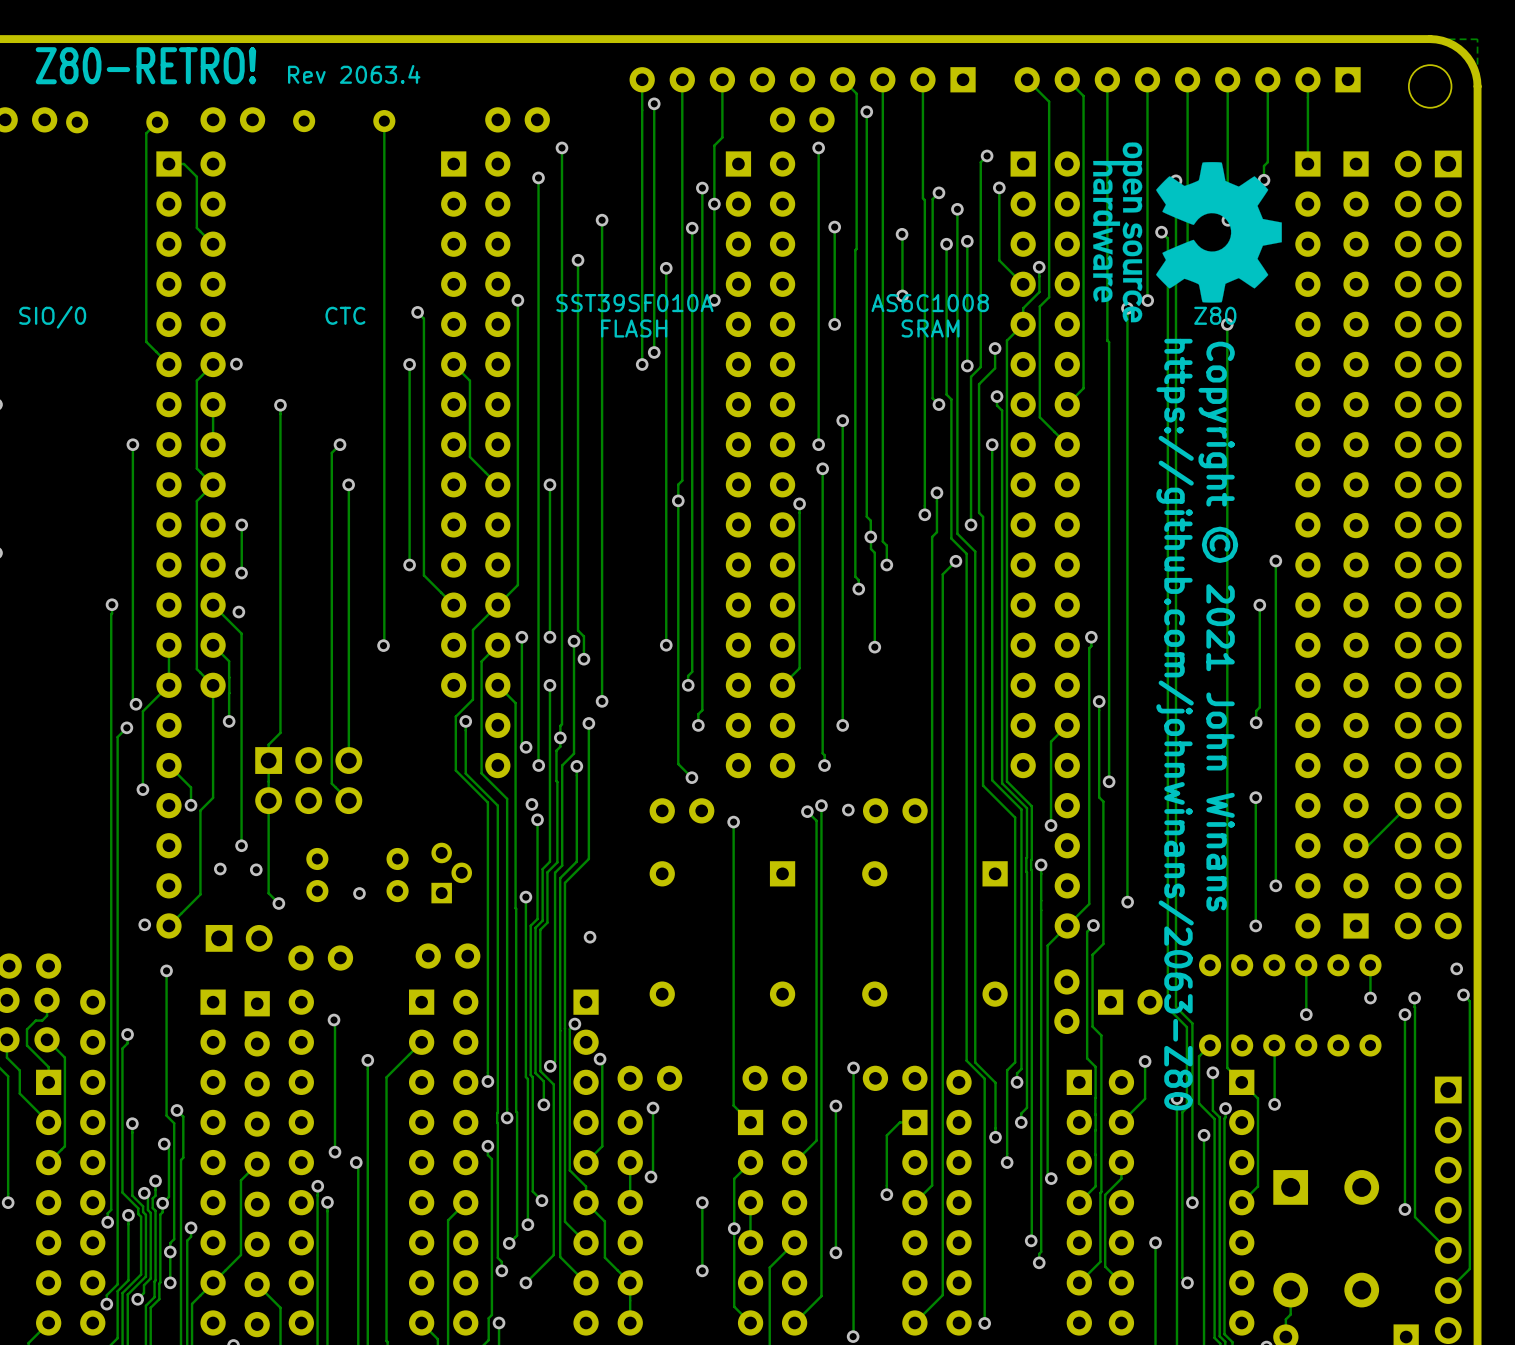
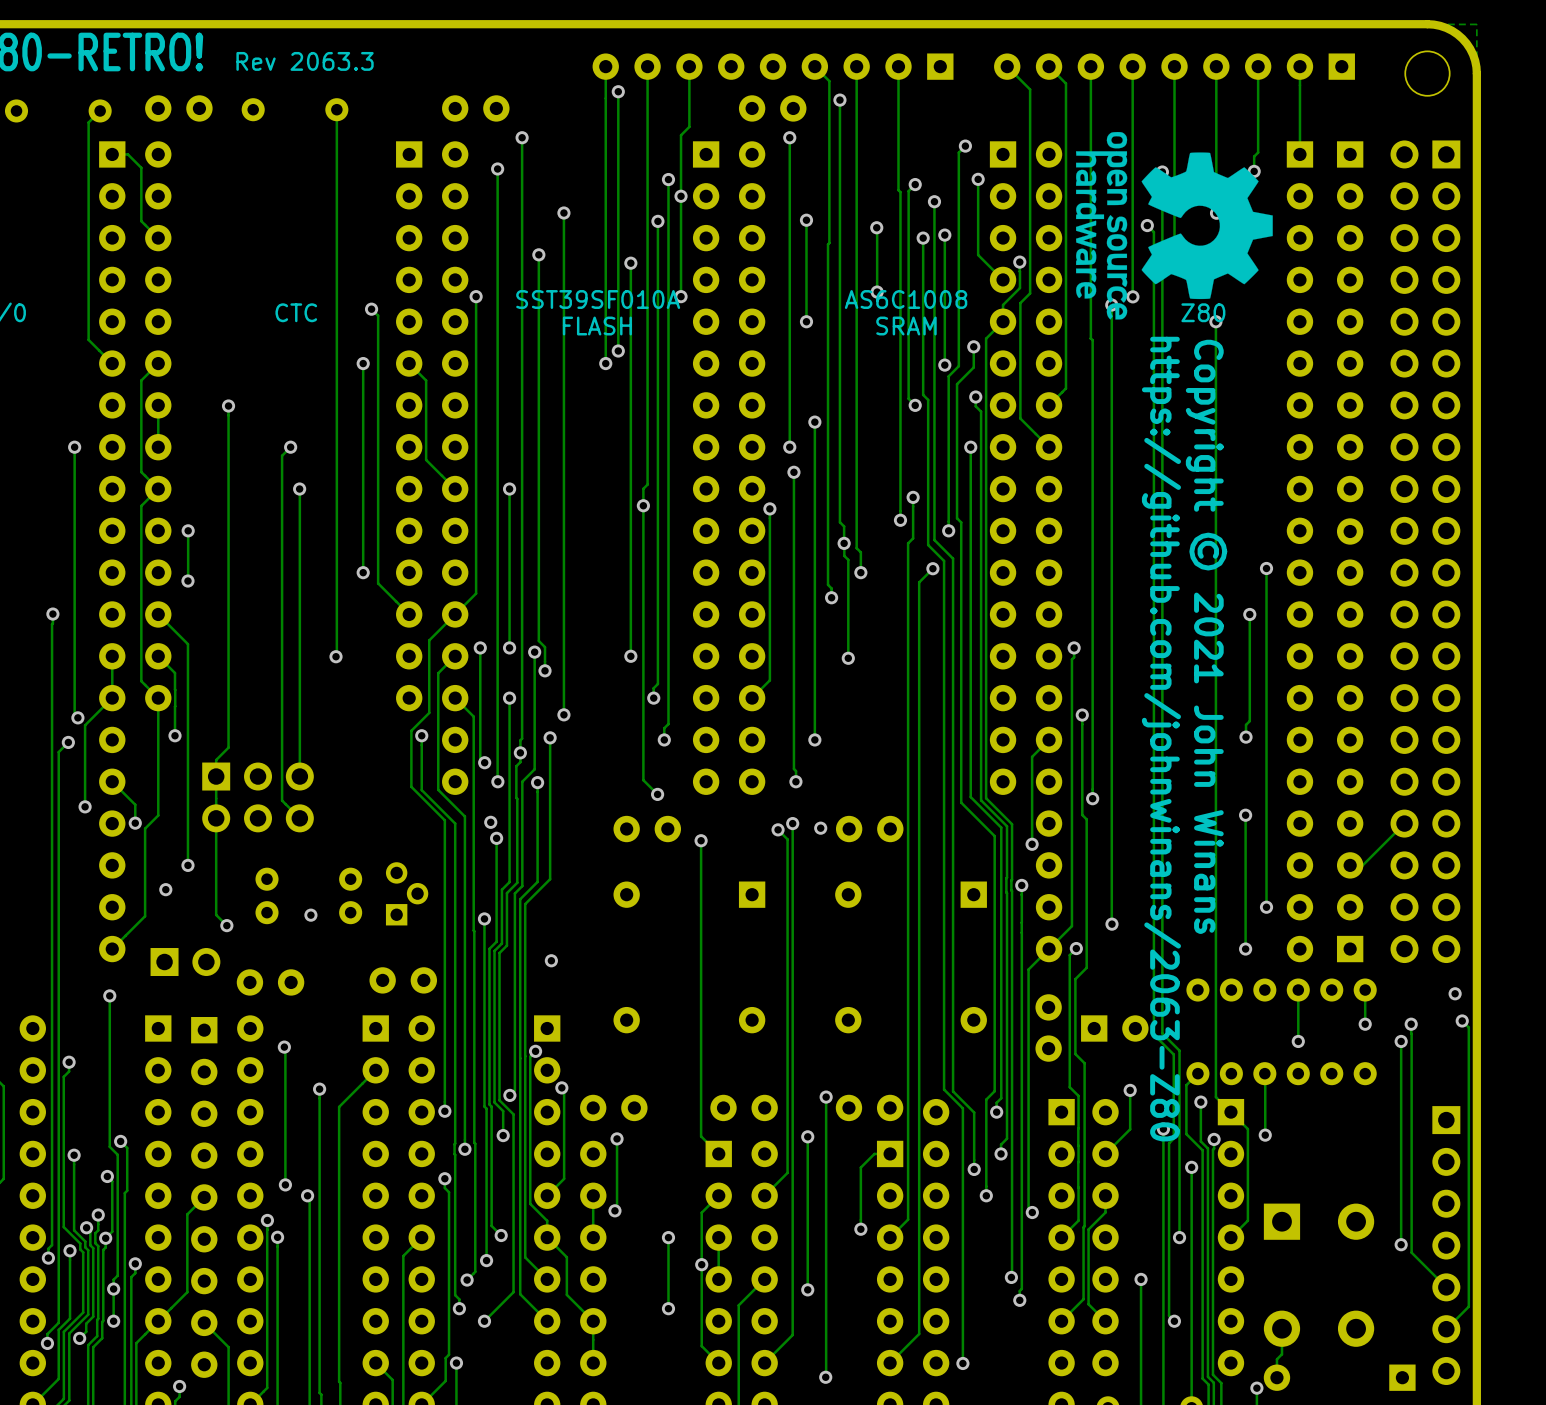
text: Rev 2063.4 (354, 74) -> Rev 2063.3 (305, 61)
via: (236, 364) -> none
via: (238, 612) -> none
via: (256, 869) -> none
via: (144, 924) -> none

